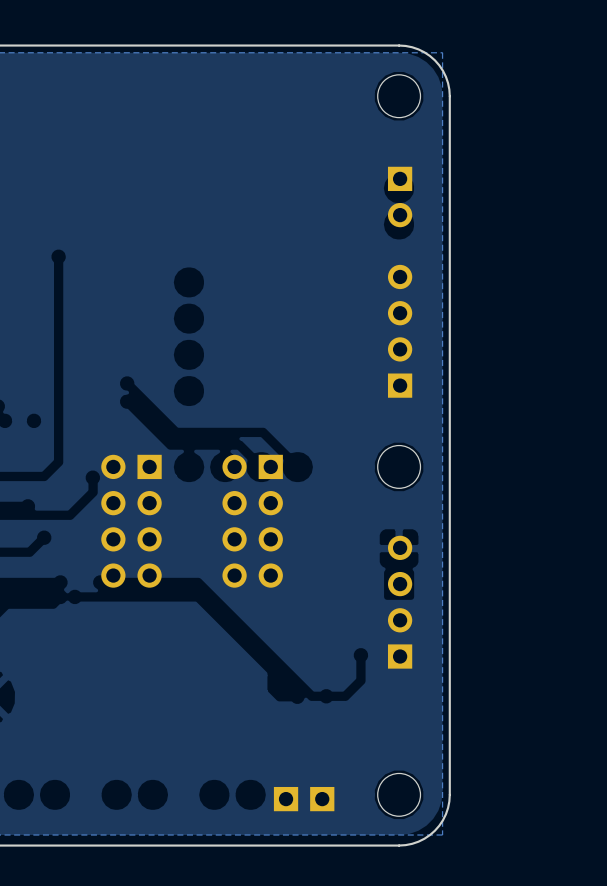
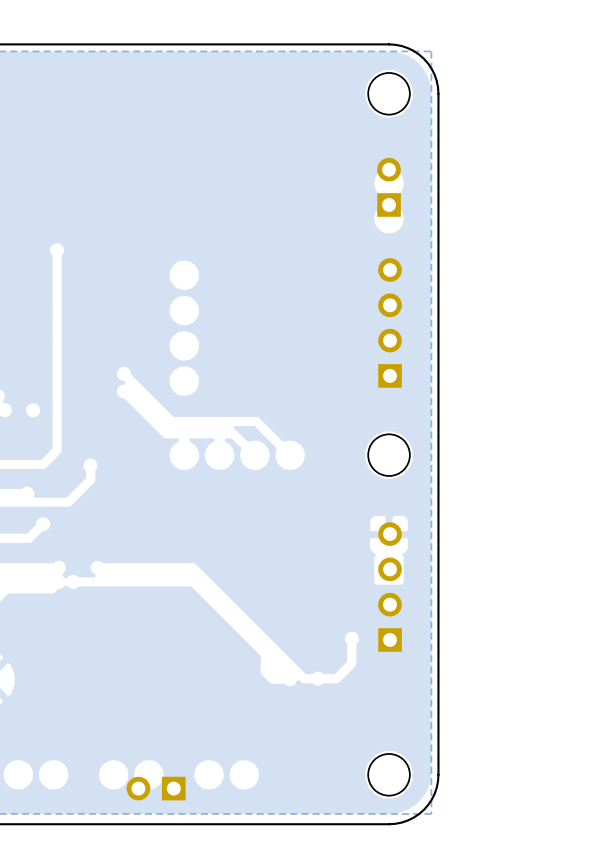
part rotation: 0° (400, 196) -> 180° (389, 187)
part: (131, 521) -> none
part: (252, 521) -> none
part: (304, 799) -> none
part: none -> (156, 788)

